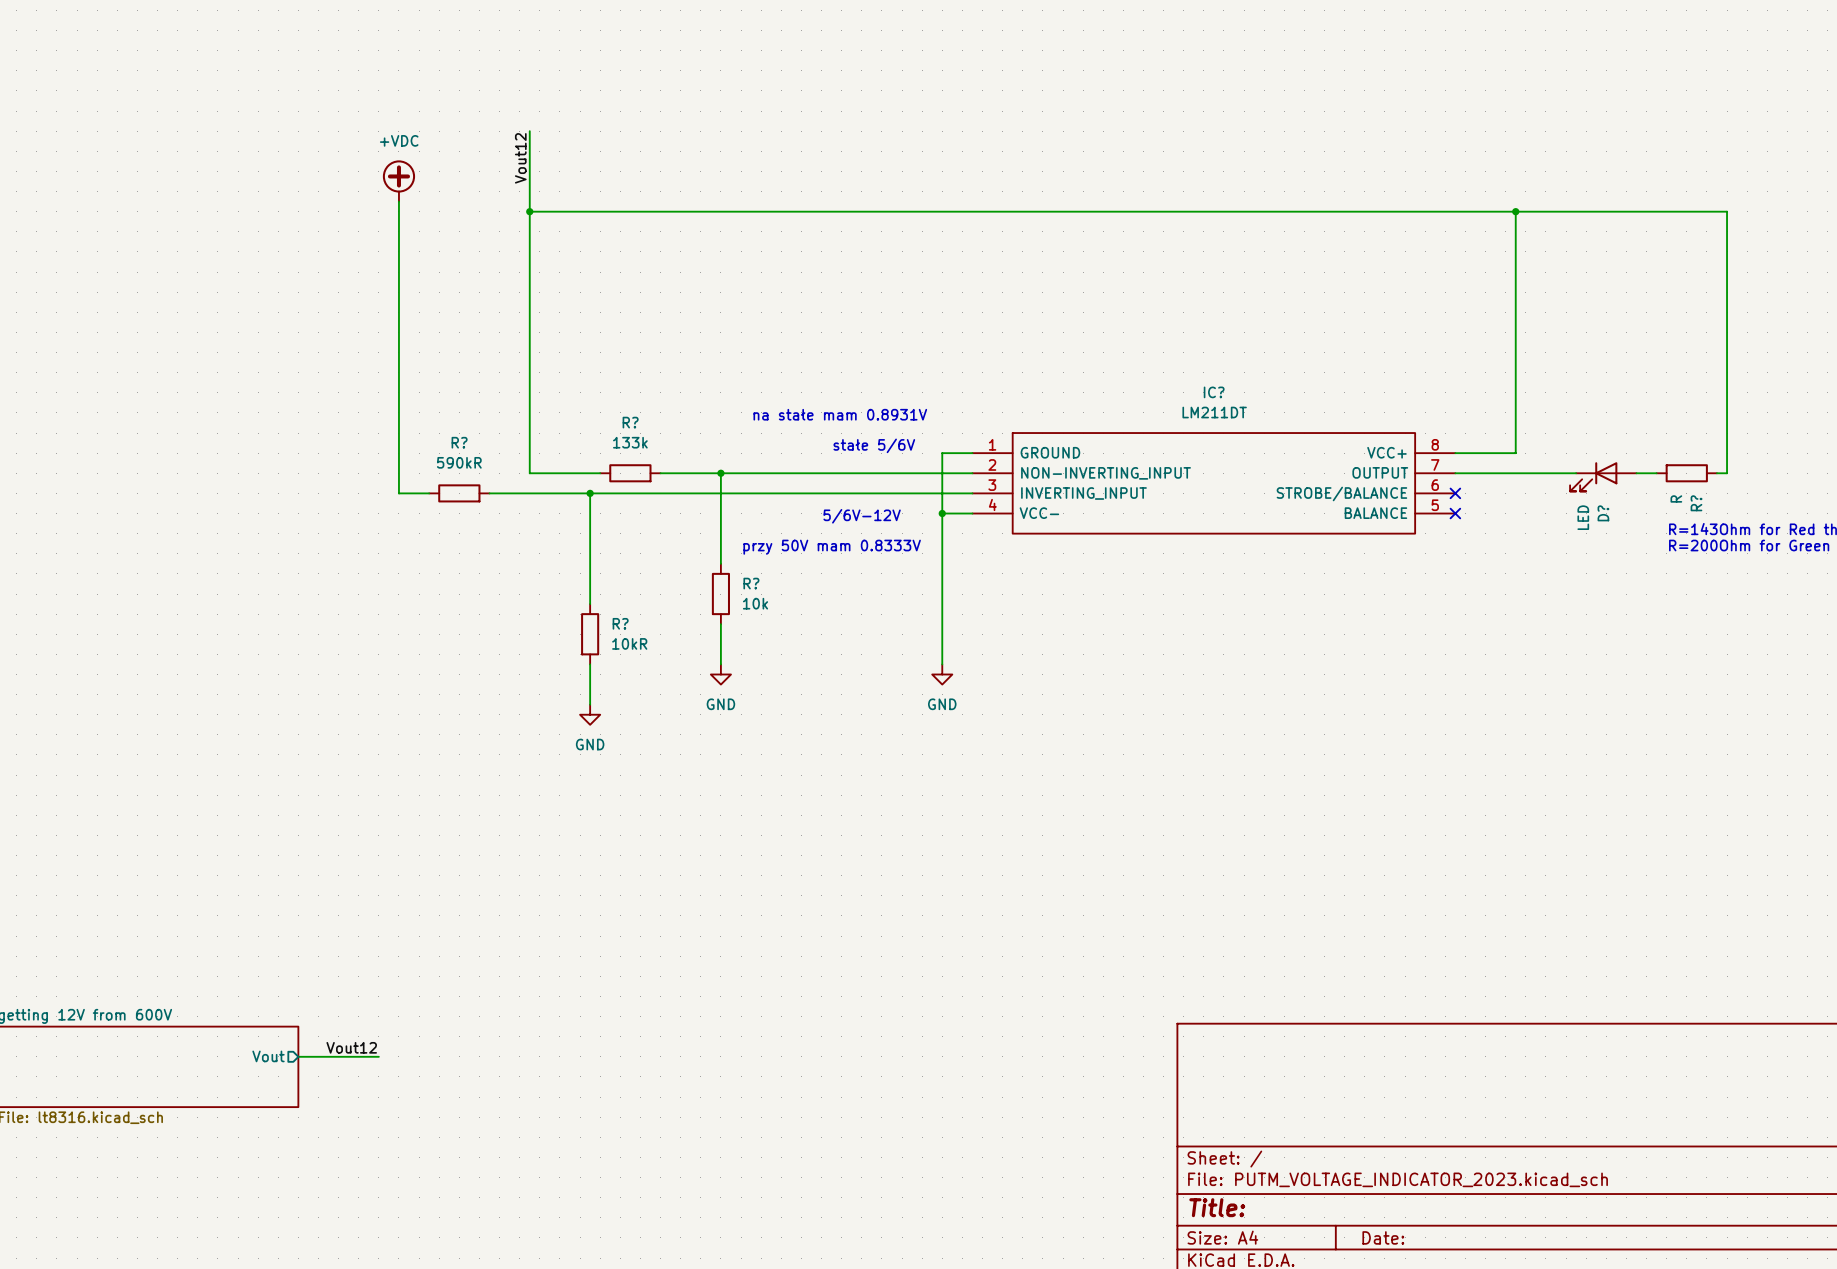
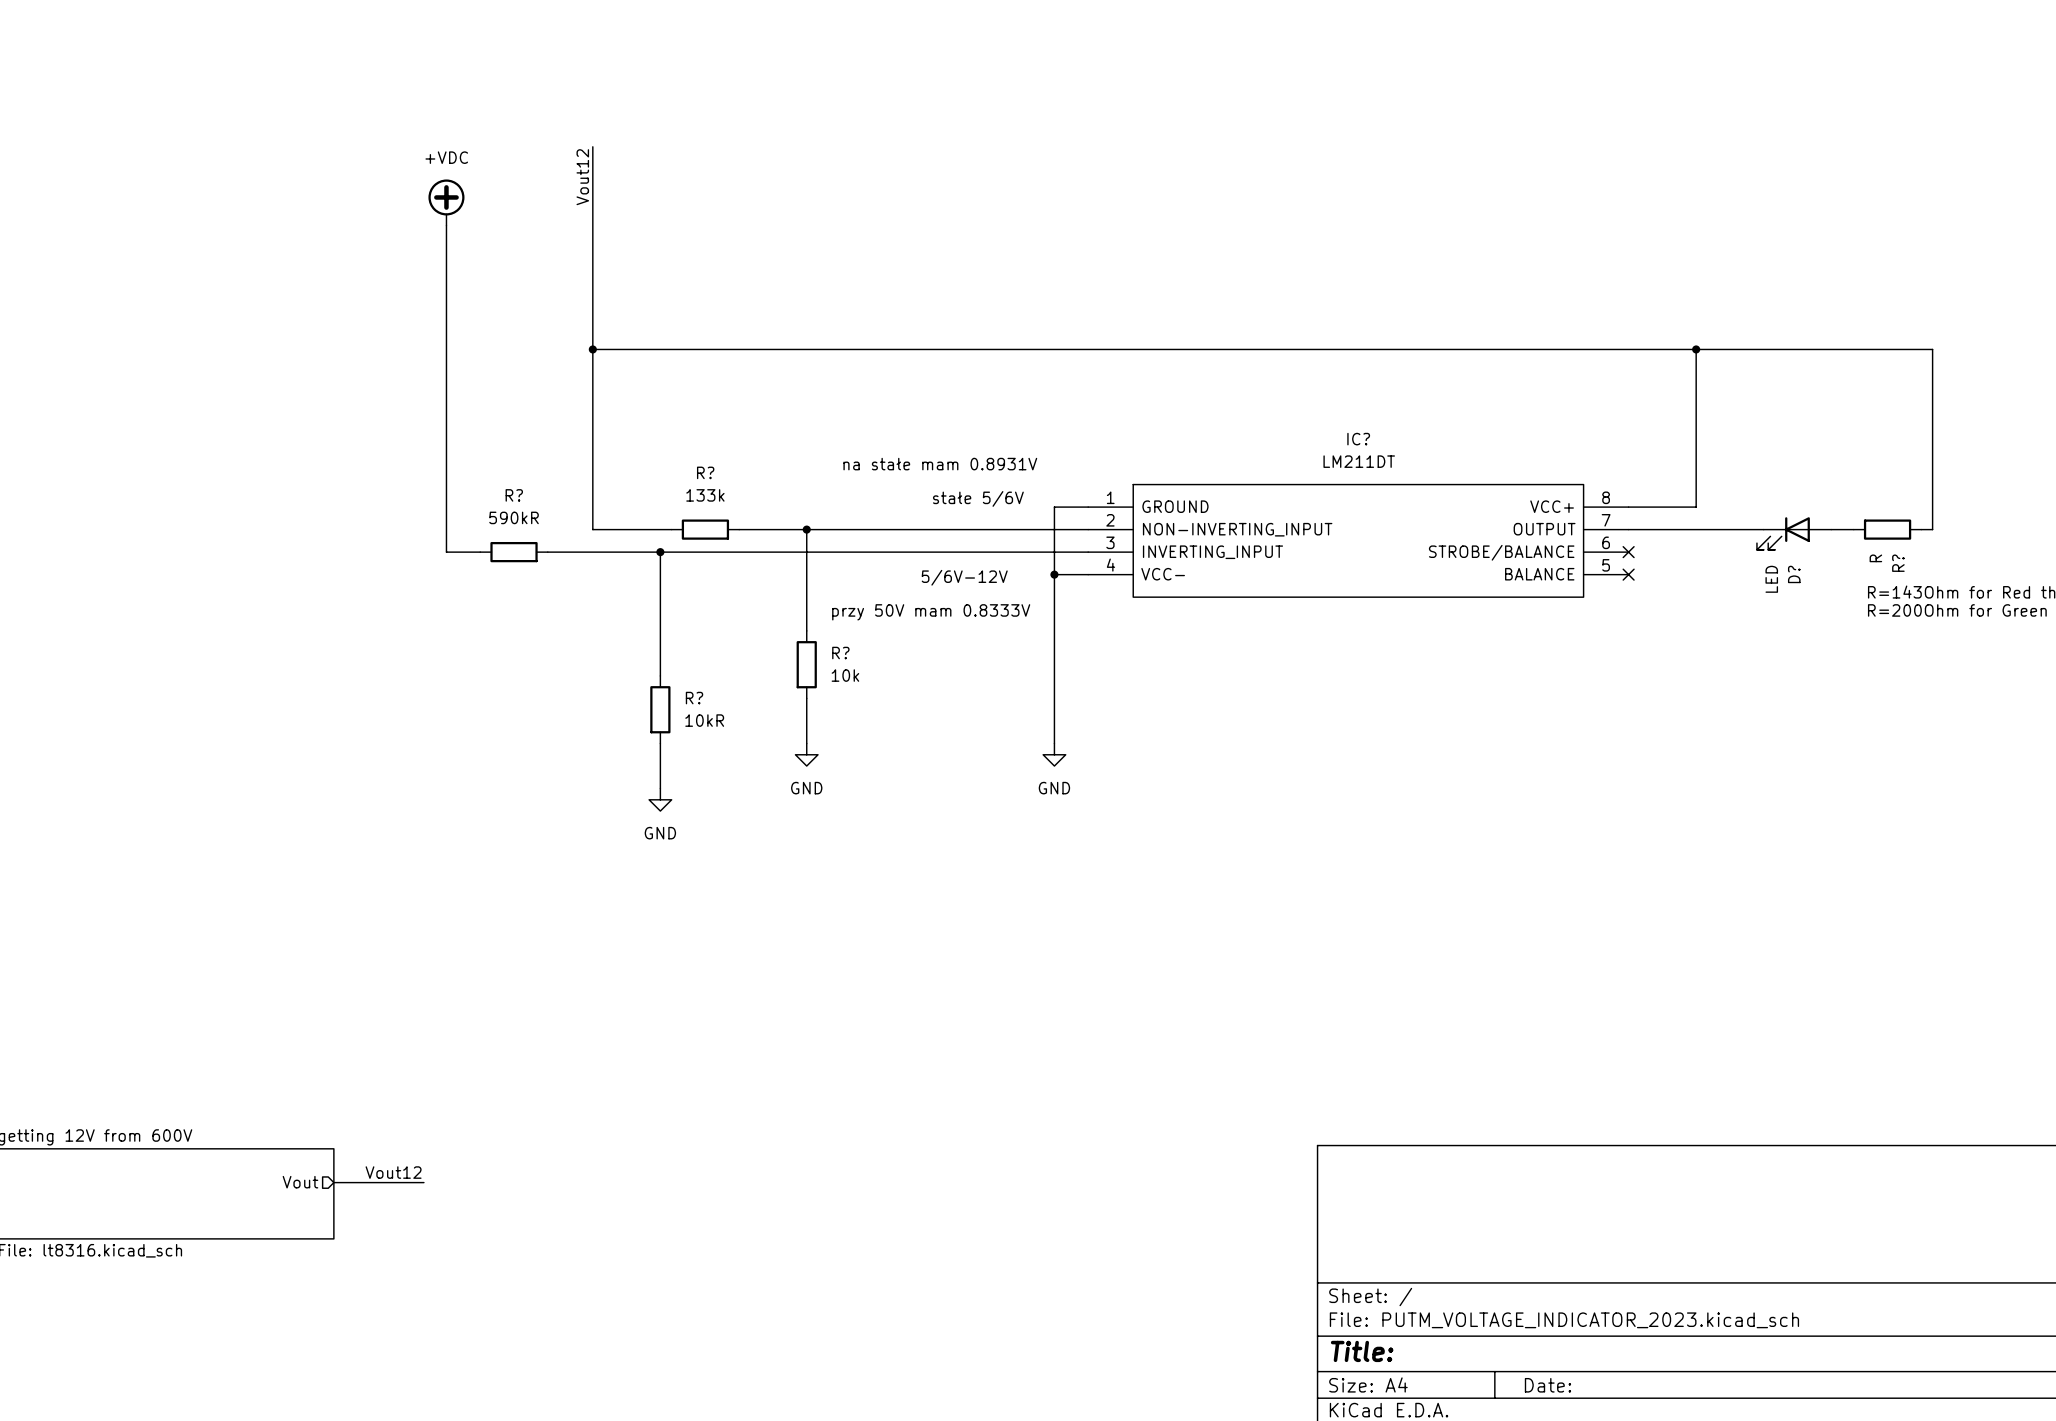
wire: (529, 211) (1727, 211) (1727, 312) -> (592, 349) (1932, 349)
junction: (529, 211) -> none
wire: (1515, 211) (1515, 312) -> none
junction: (1515, 211) -> none
junction: none -> (592, 349)
junction: none -> (1696, 349)

